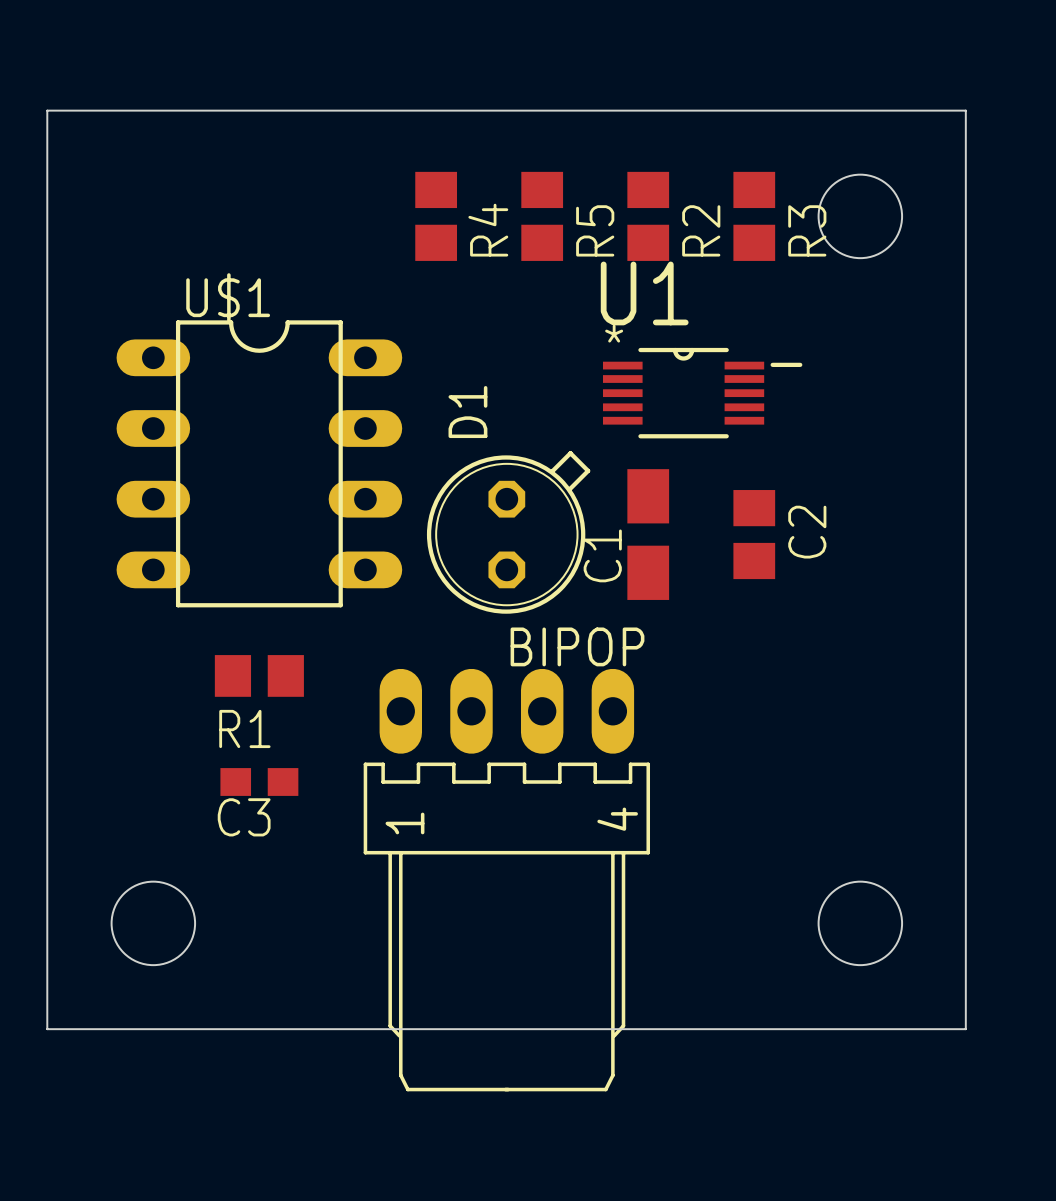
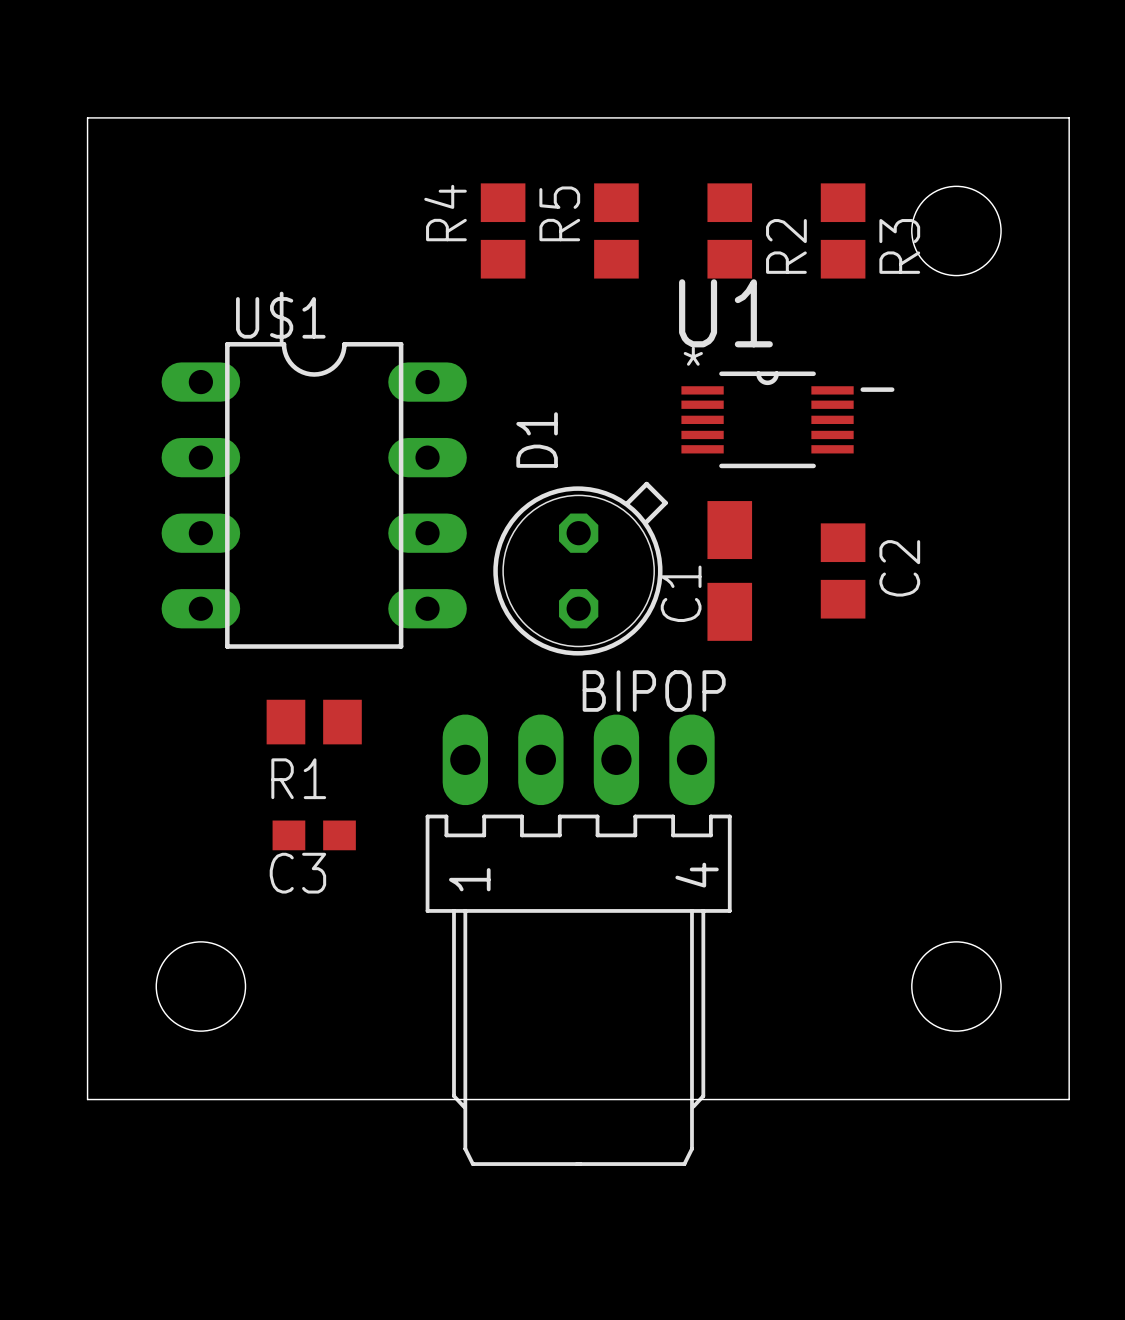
R4 name position: R4 (488, 230) -> R4 (445, 213)
R5 name position: R5 (595, 230) -> R5 (559, 213)

